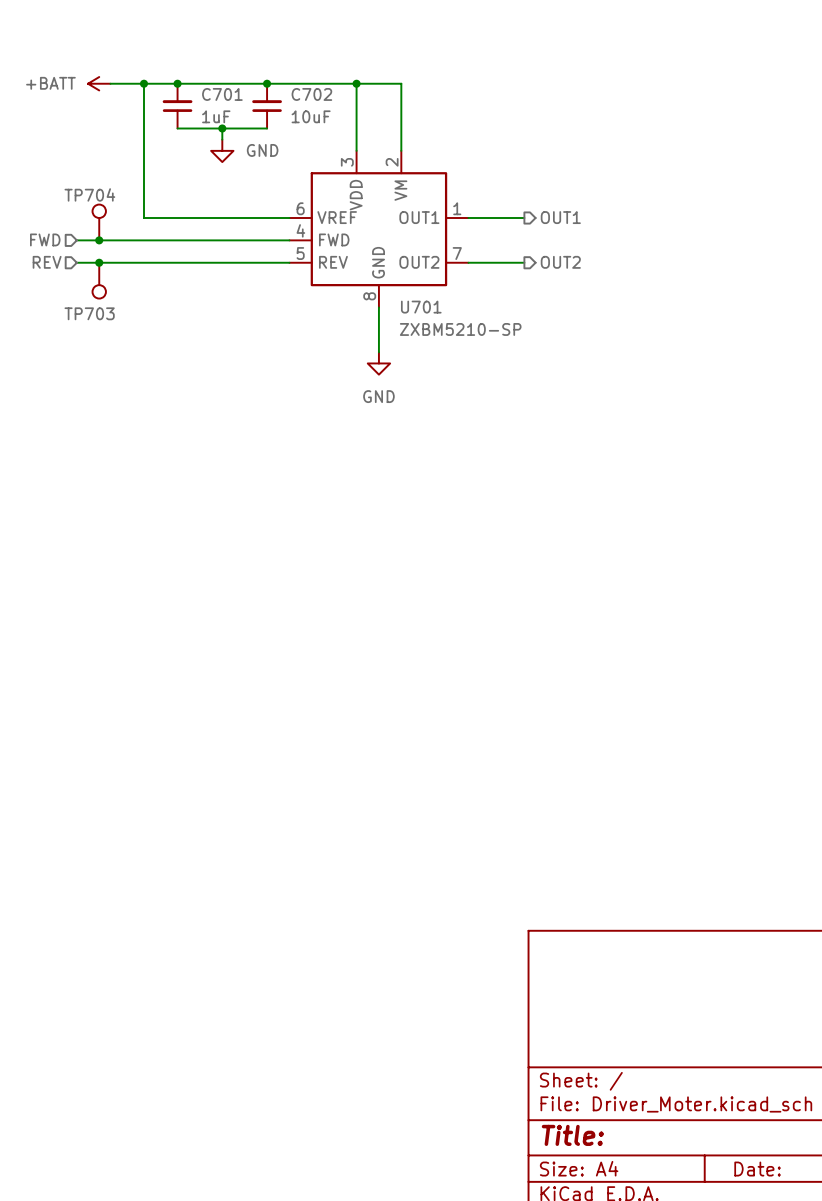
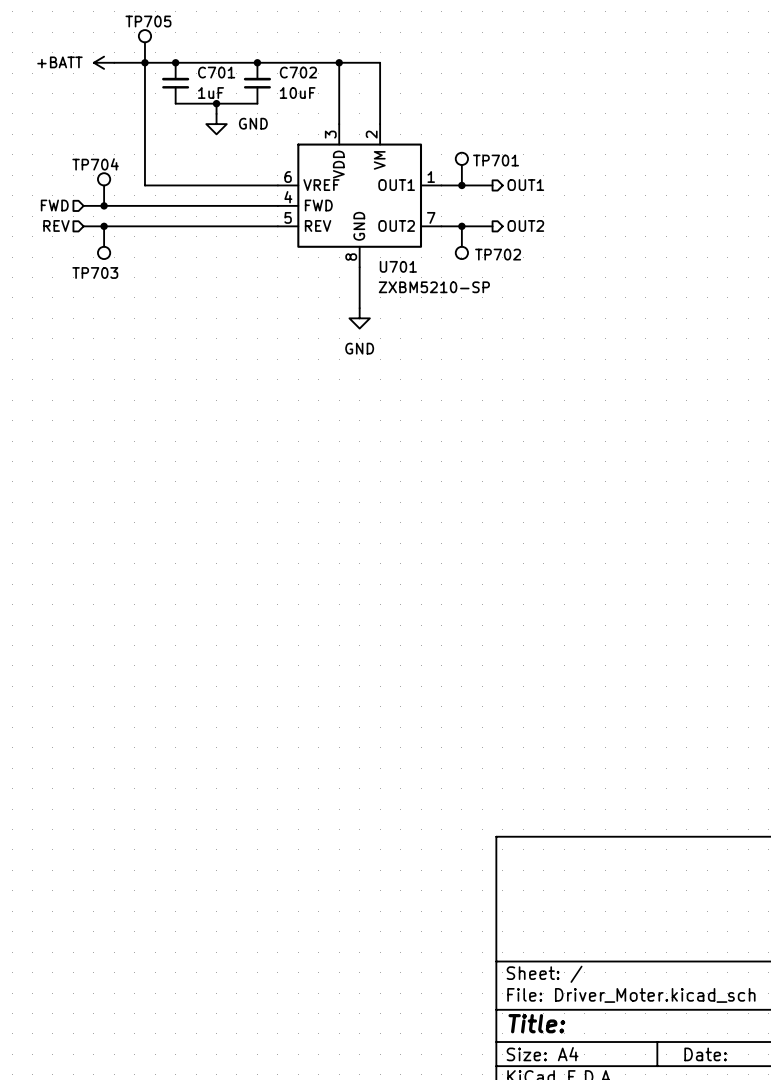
TP705: none -> (144, 46)
TP701: none -> (461, 169)
junction: none -> (461, 185)
junction: none -> (461, 226)
TP702: none -> (461, 242)

